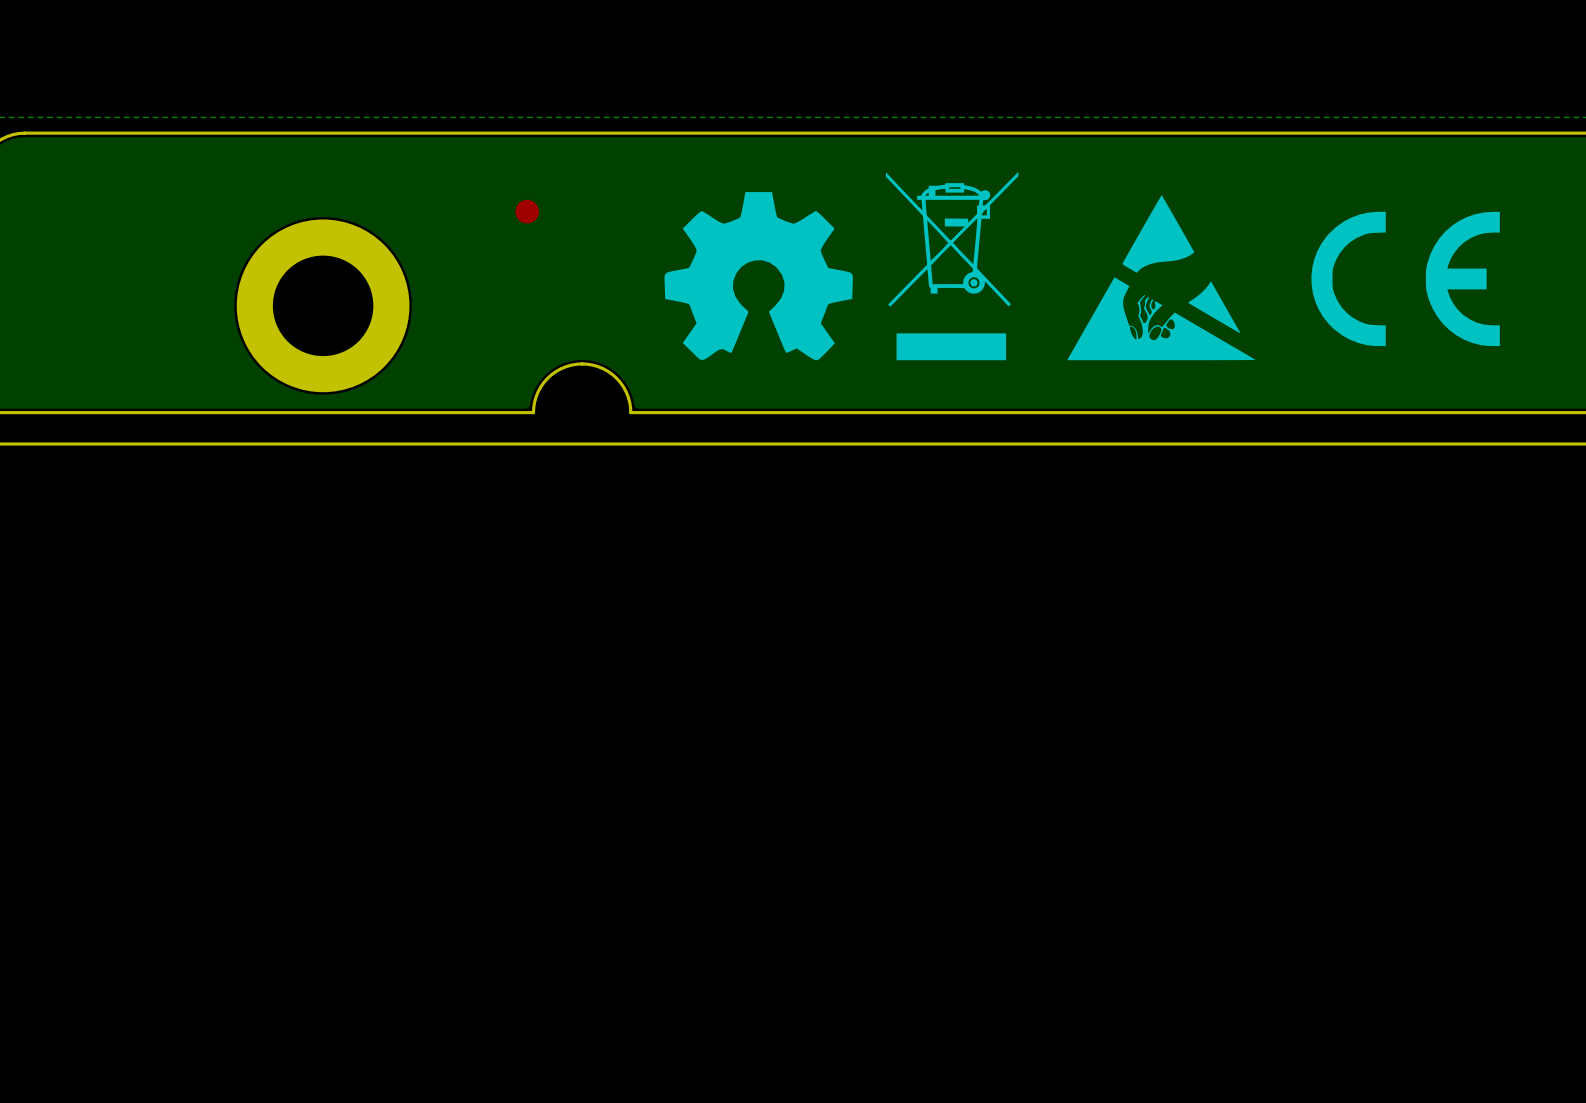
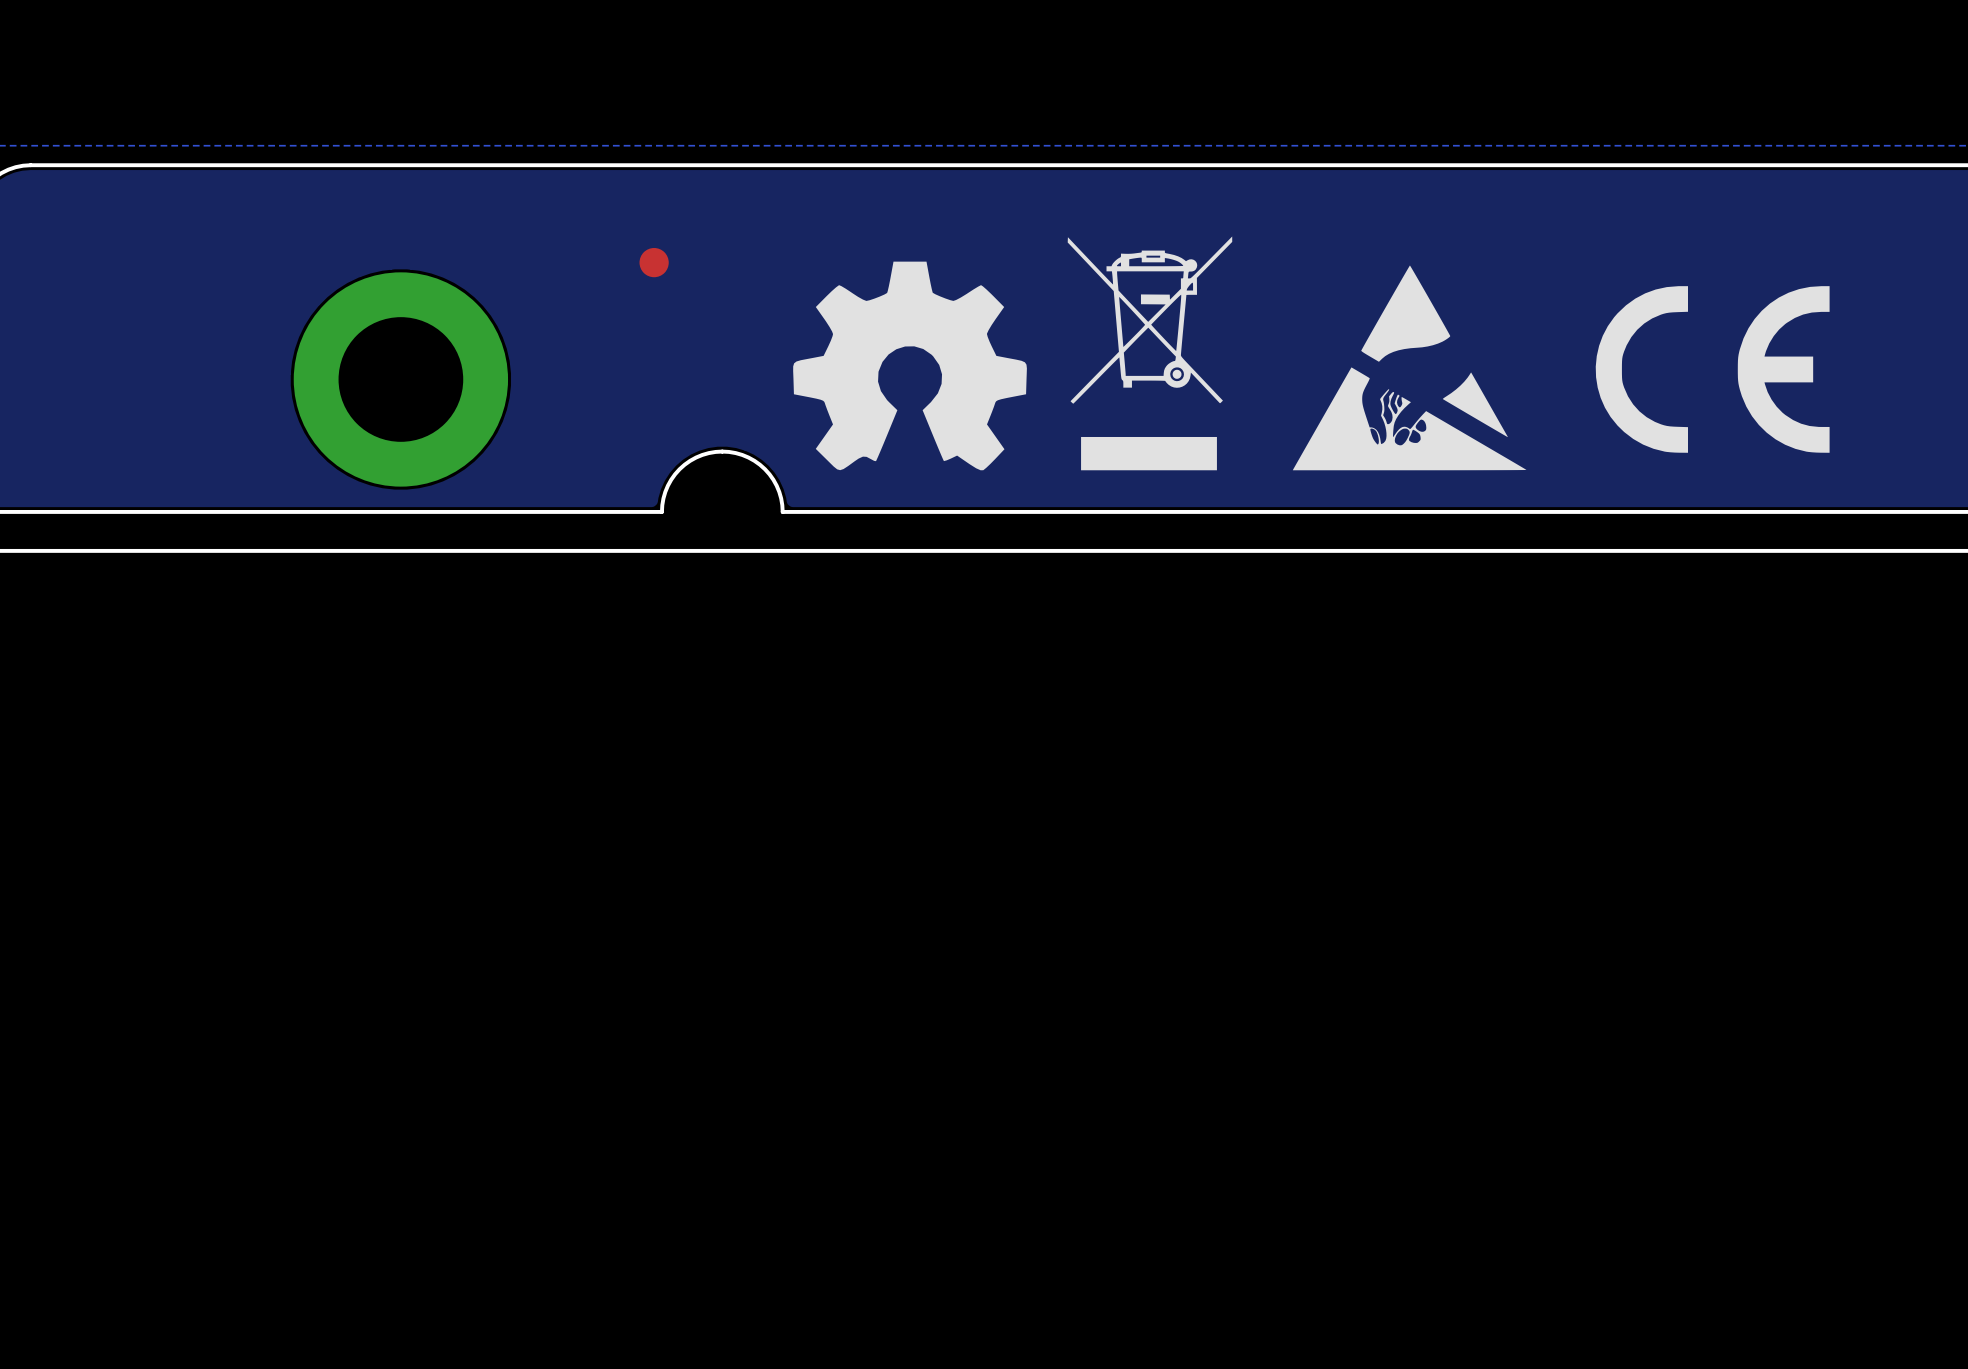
drawing position: (952, 266) -> (1149, 353)
drawing position: (758, 276) -> (910, 365)
drawing position: (1161, 277) -> (1409, 367)
drawing position: (1405, 278) -> (1712, 369)

